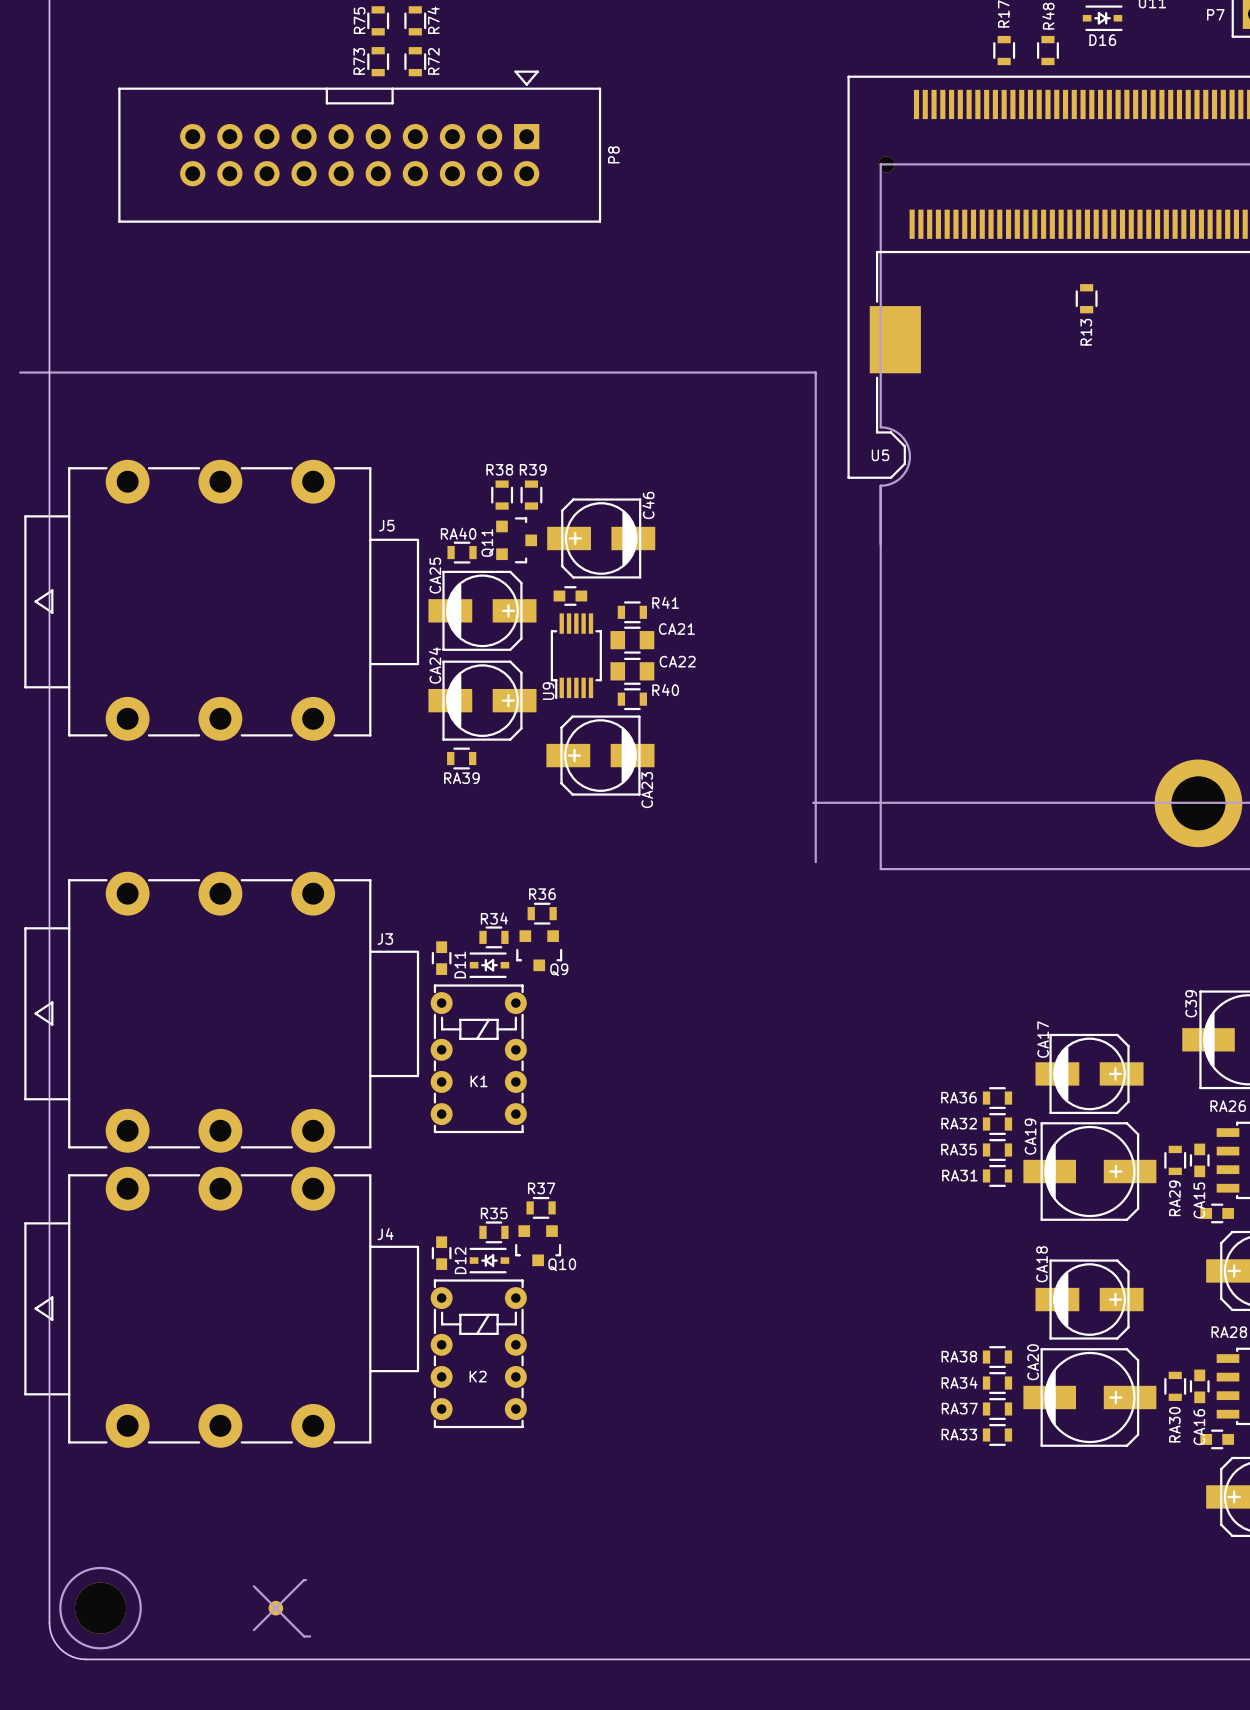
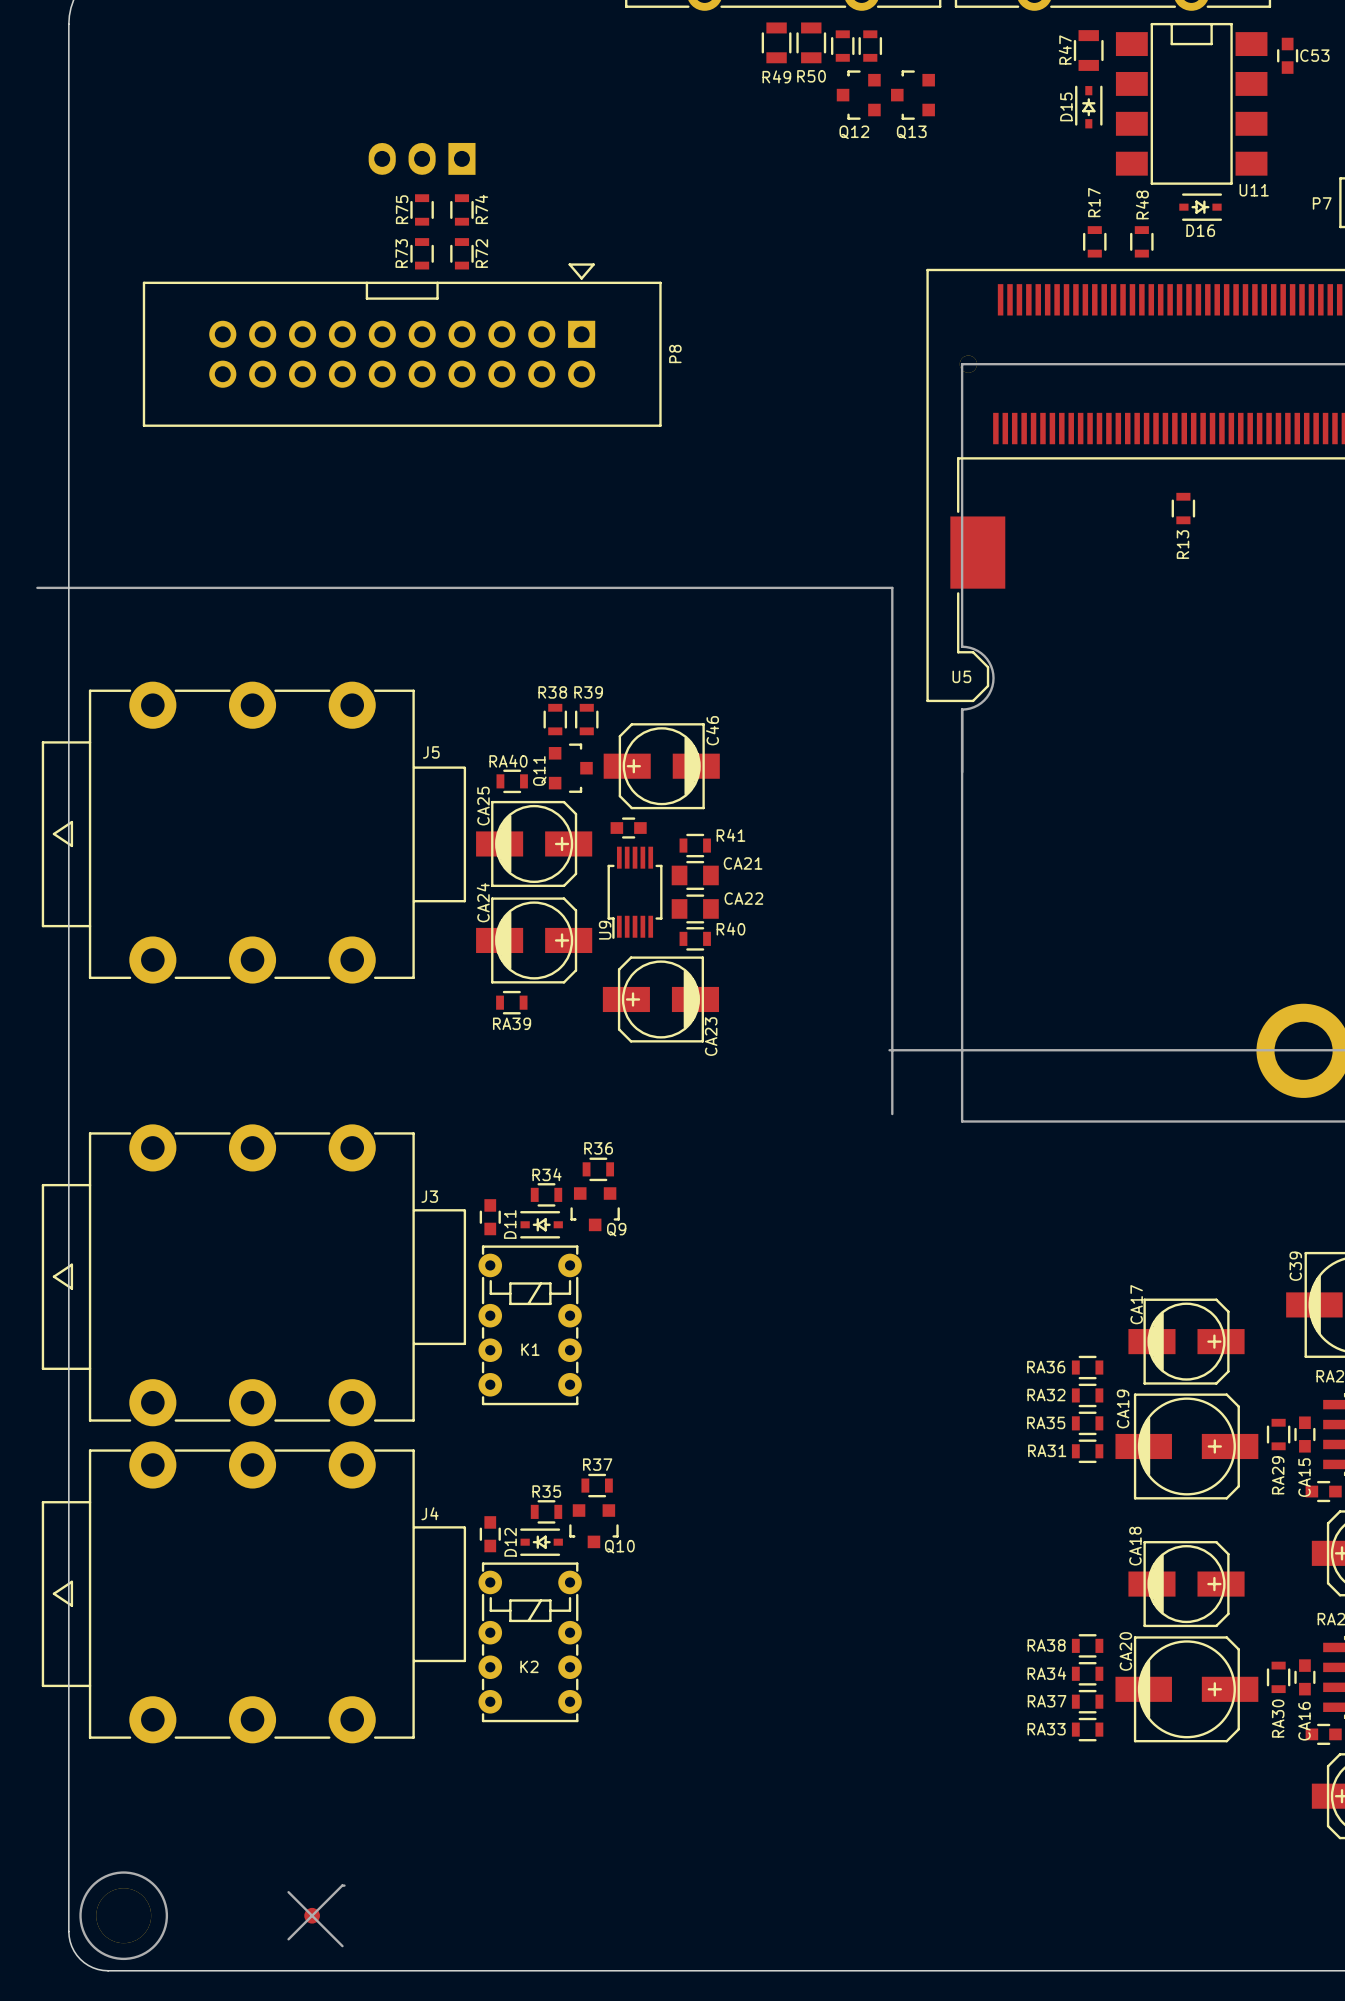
line: (304, 1636) (310, 1636) -> none

